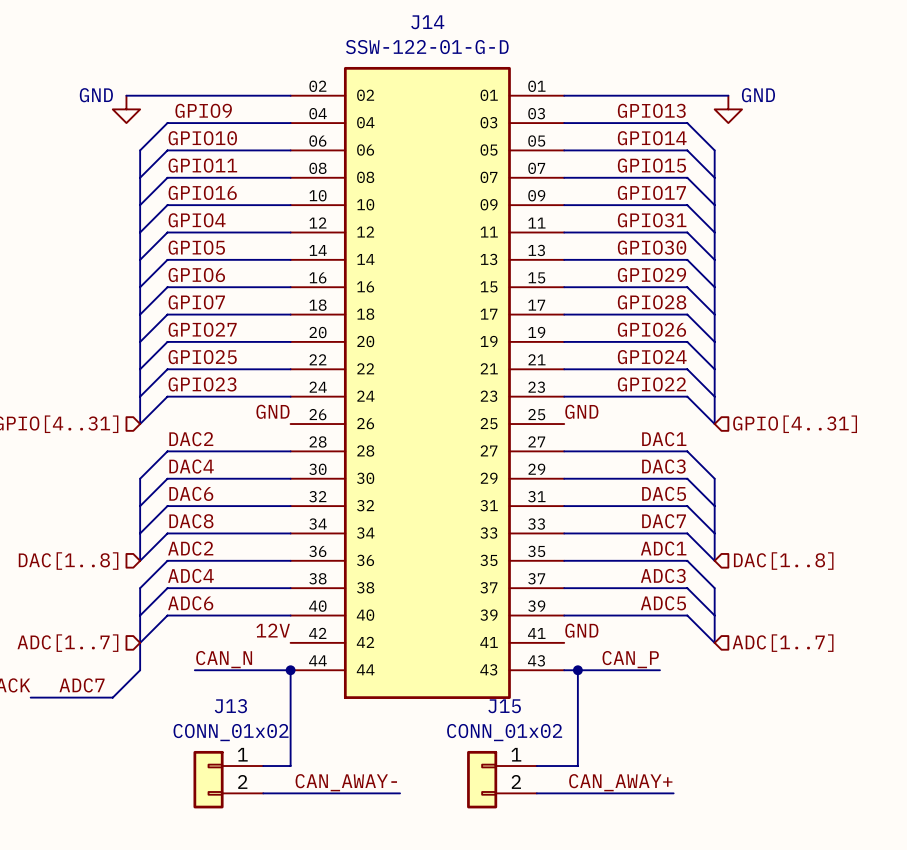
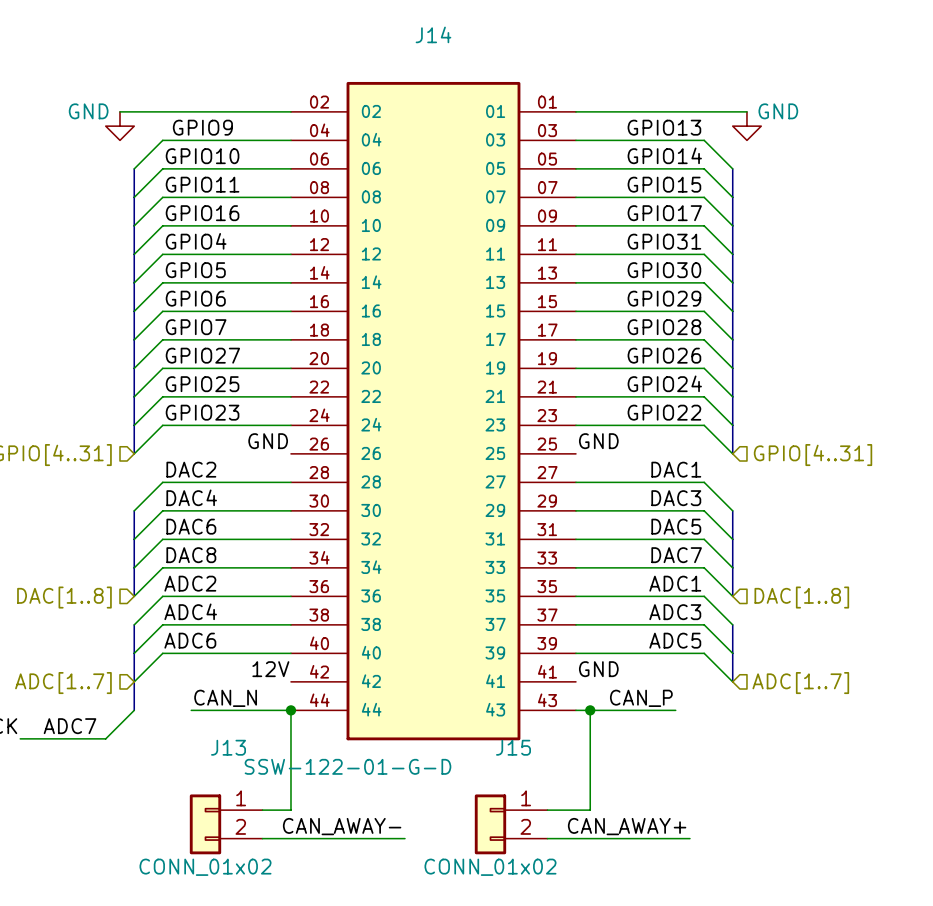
J14 value position: SSW-122-01-G-D (427, 47) -> SSW-122-01-G-D (347, 766)
J13 value position: CONN_01x02 (231, 732) -> CONN_01x02 (205, 867)
J15 value position: CONN_01x02 (504, 732) -> CONN_01x02 (490, 867)

